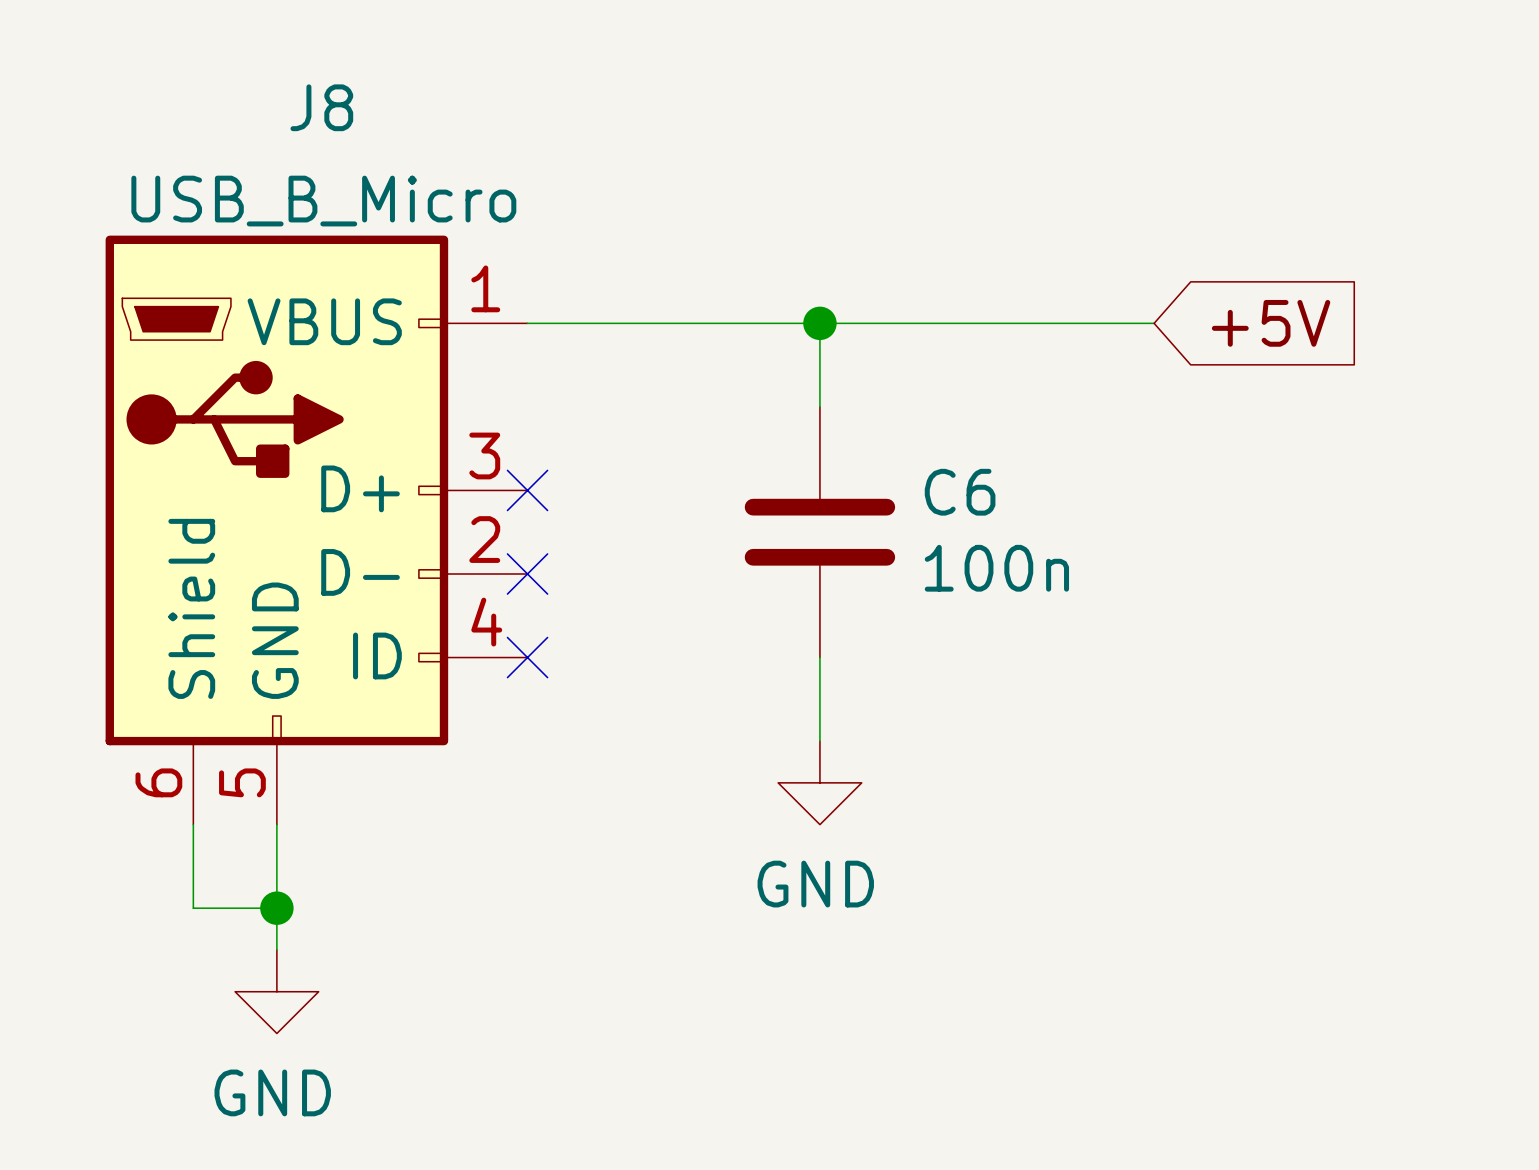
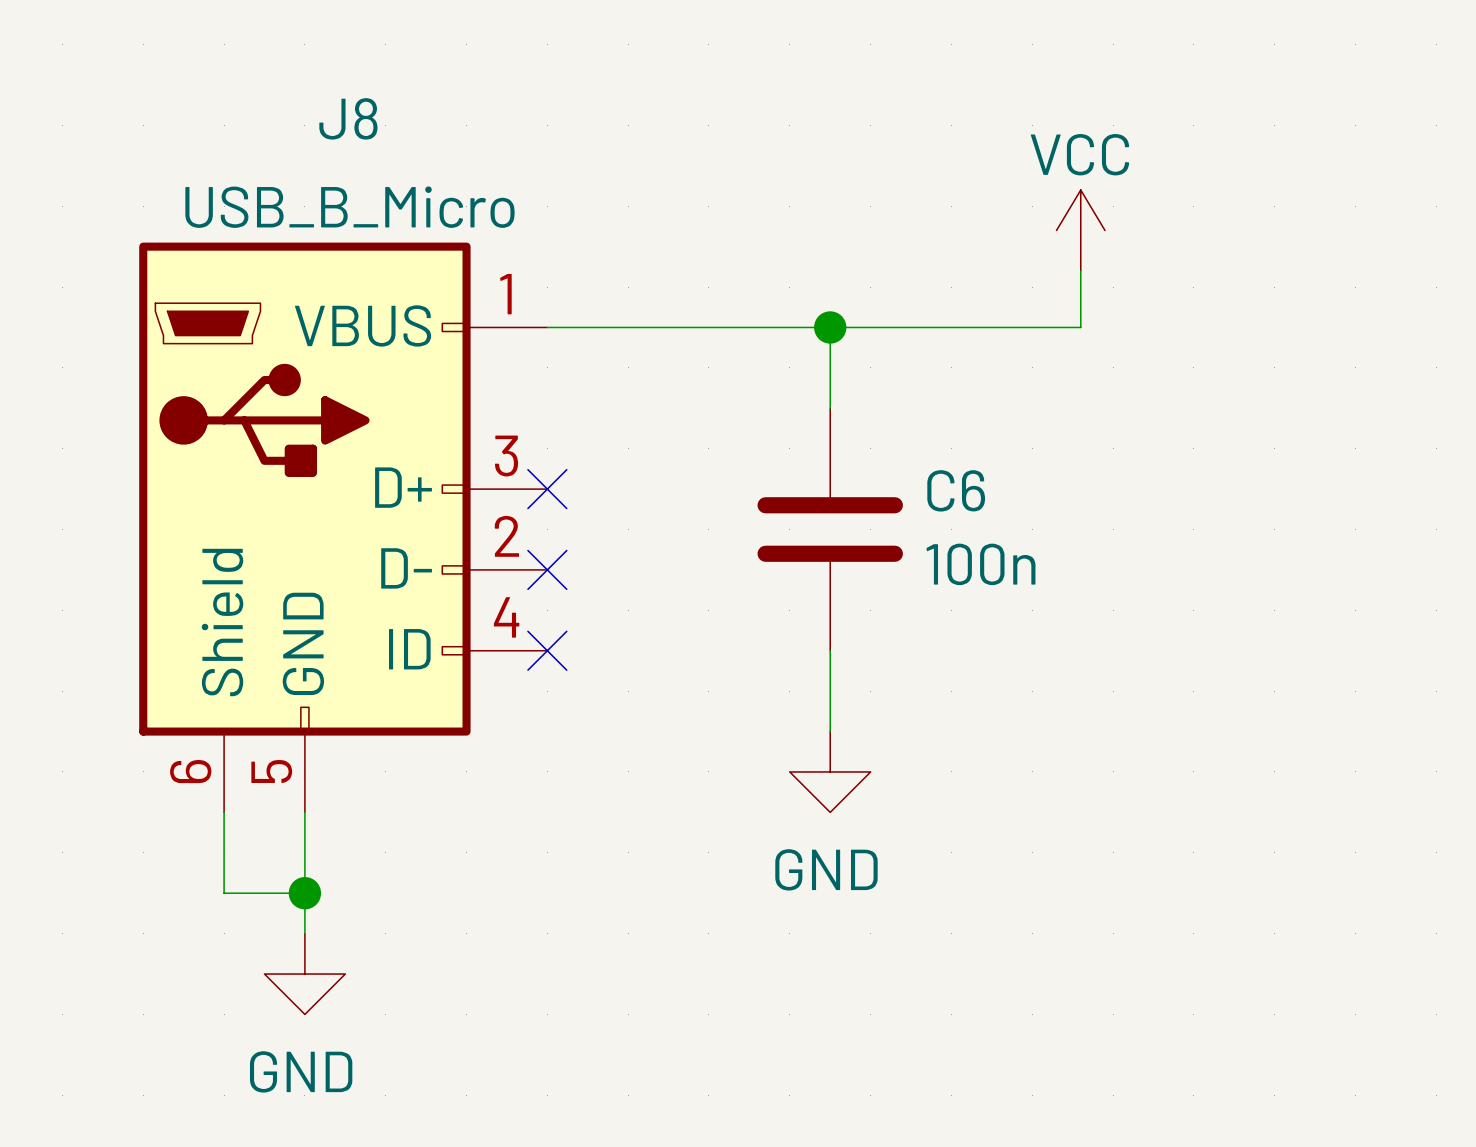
power symbol: none -> VCC (1080, 230)
wire: (1078, 323) (1154, 323) -> (1080, 327) (1080, 270)
global label: +5V (1271, 323) -> none

